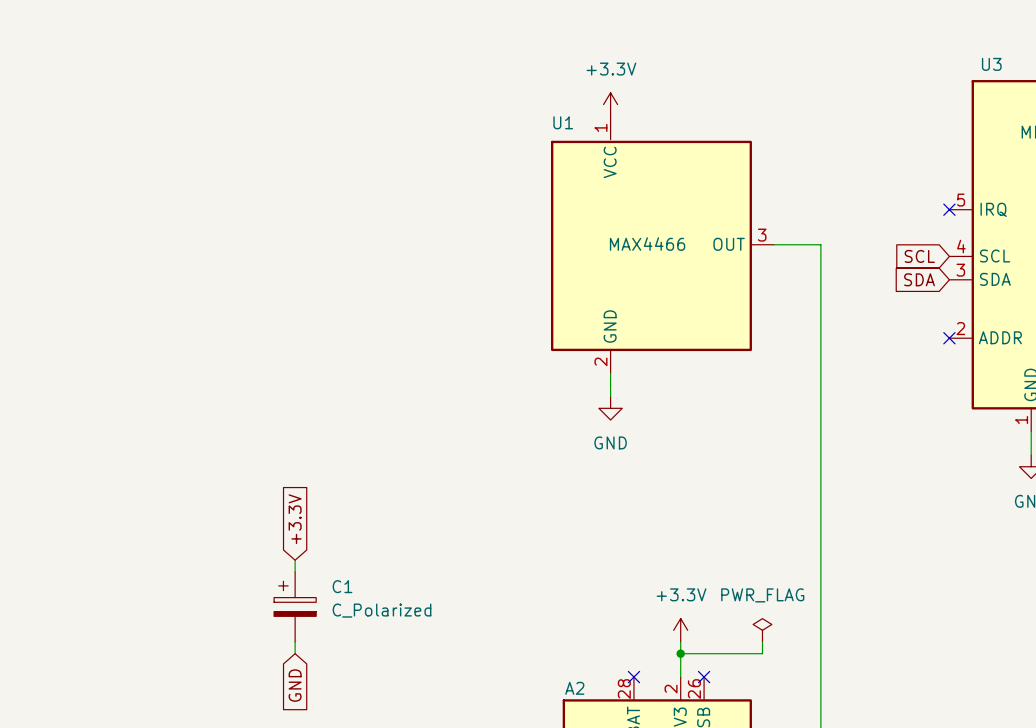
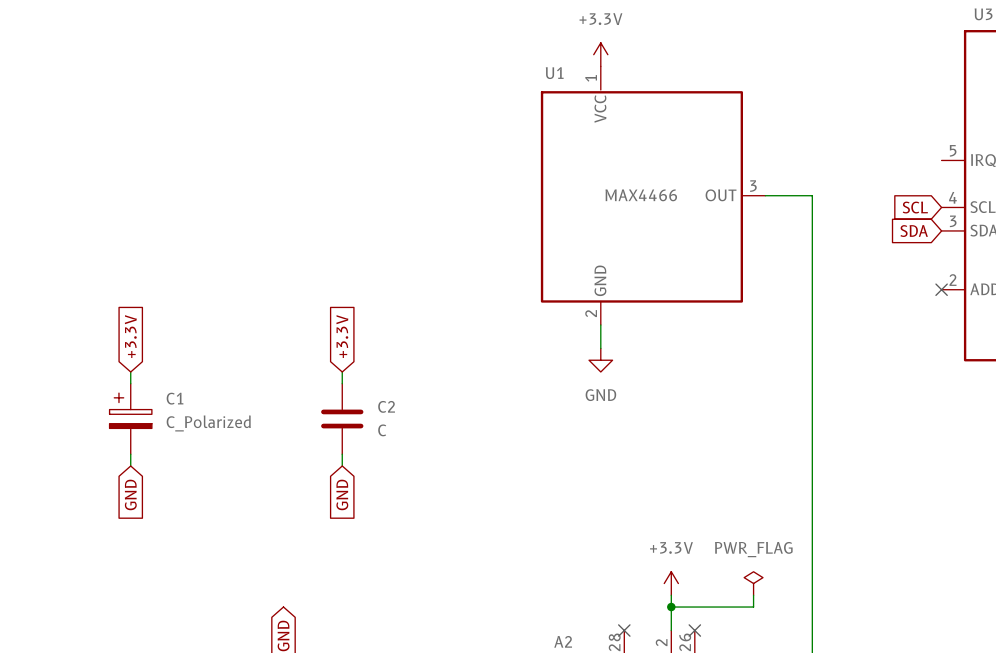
no-connect mark: (949, 209) -> none
global label: none -> +3.3V (130, 336)
global label: none -> +3.3V (342, 336)
wire: none -> (130, 371) (130, 383)
C2: none -> C (342, 418)
wire: none -> (130, 454) (130, 466)
global label: +3.3V (295, 519) -> none
global label: none -> GND (130, 494)
global label: none -> GND (342, 494)
wire: (295, 560) (295, 571) -> (342, 371) (342, 383)
C1 position: (295, 606) -> (130, 418)
wire: (295, 642) (295, 653) -> (342, 454) (342, 466)

